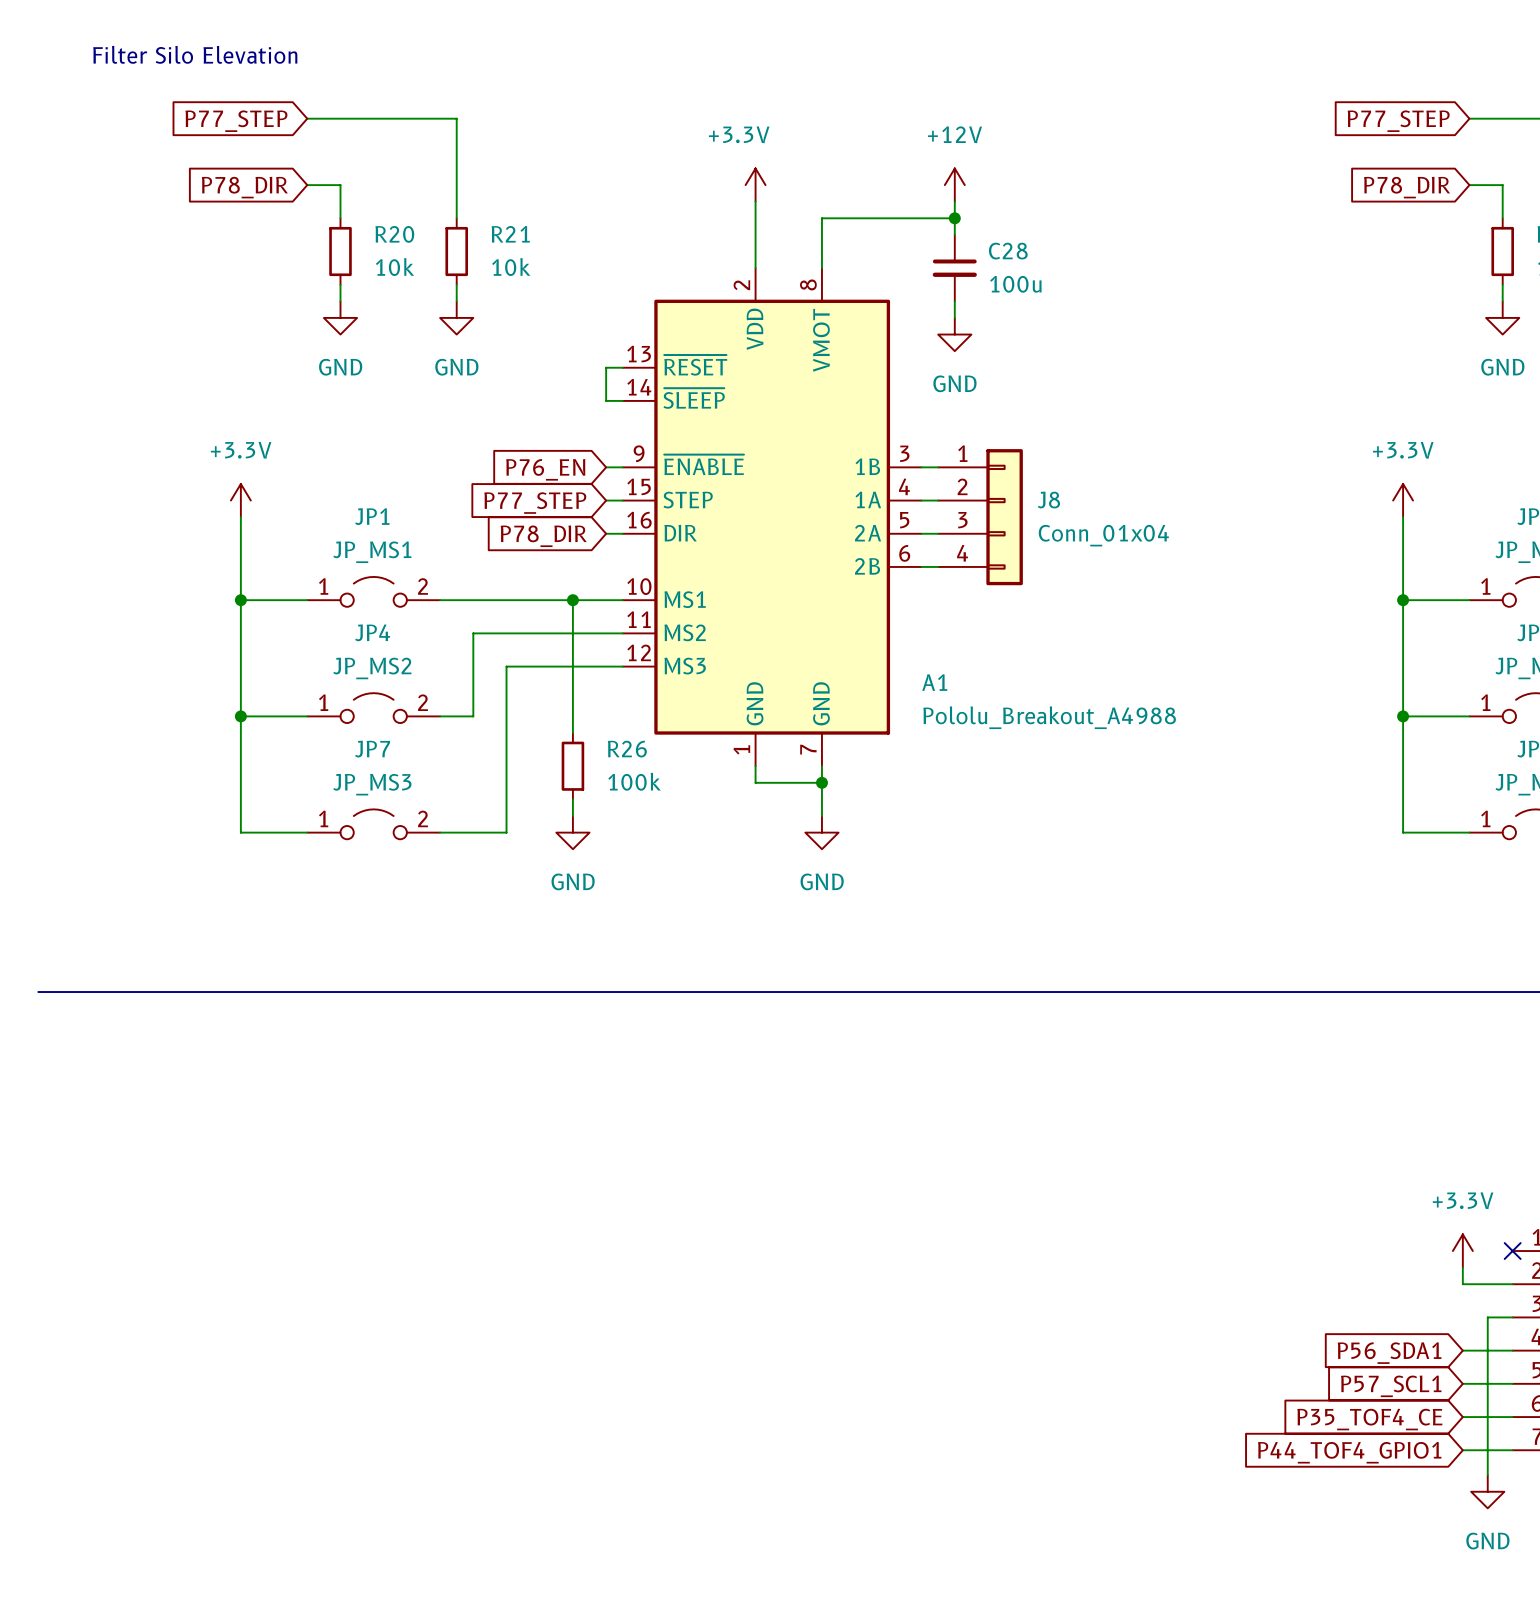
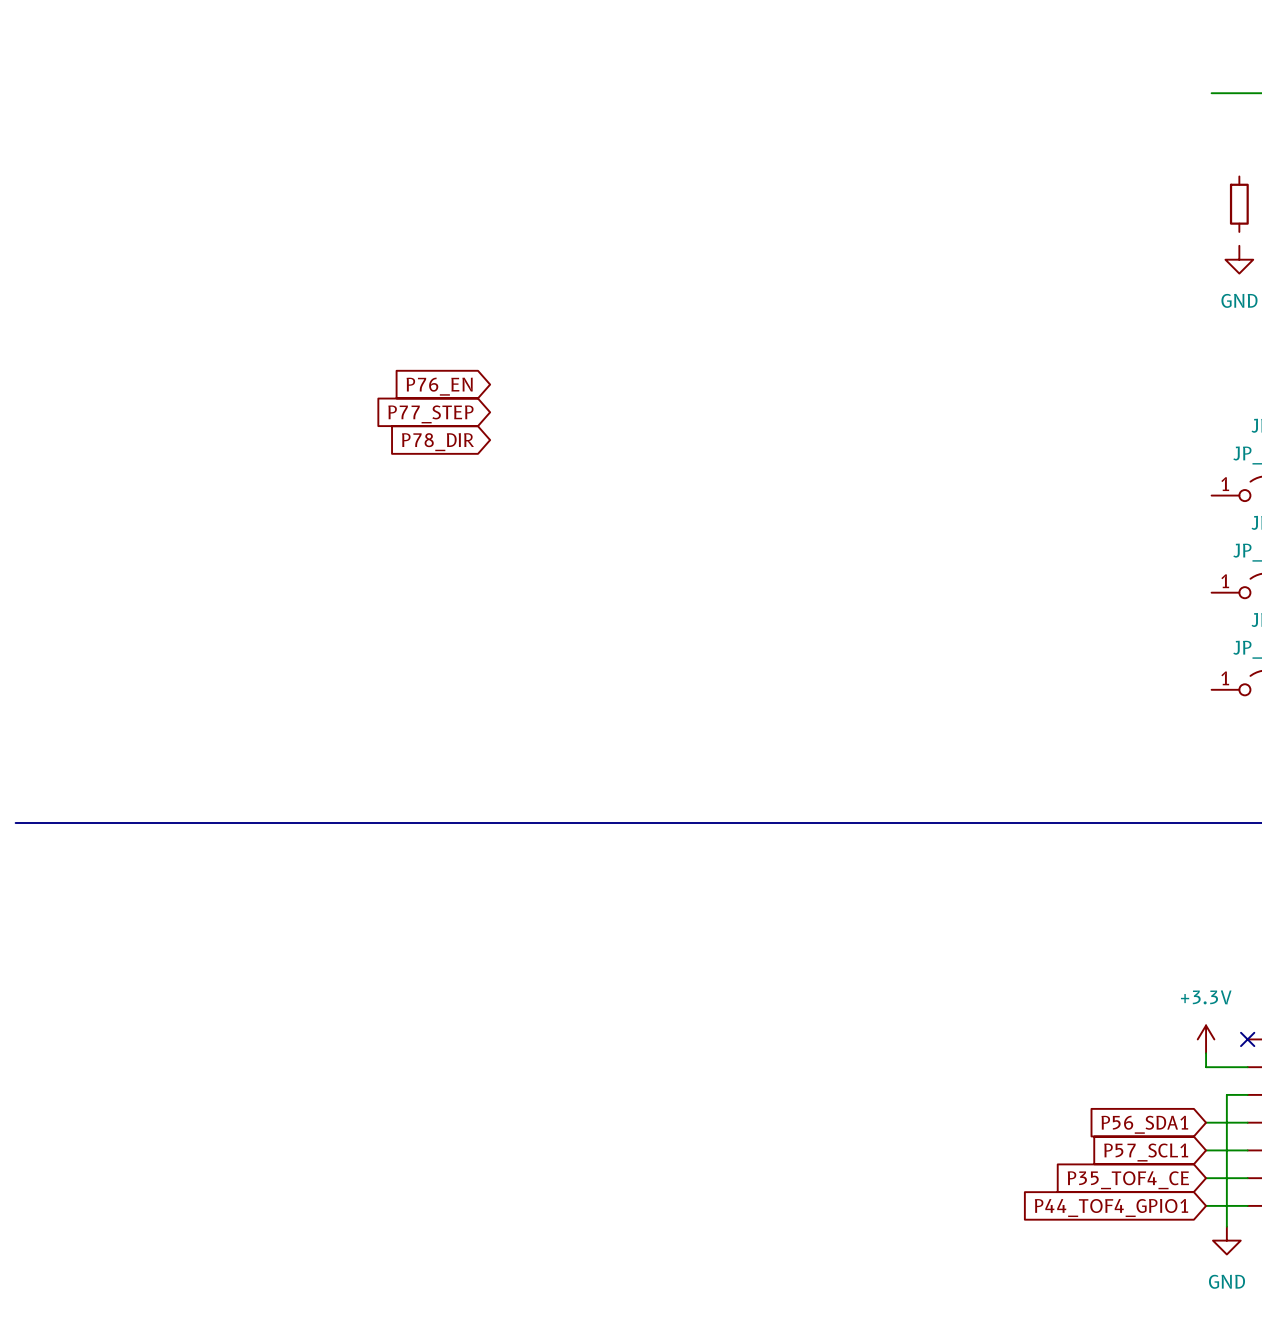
text: Filter Silo Elevation (195, 54) -> none
wire: (307, 118) (456, 118) (456, 218) -> none
global label: P77_STEP (236, 121) -> none
global label: P77_STEP (1398, 121) -> none
wire: (307, 185) (340, 185) (340, 218) -> none
power symbol: +3.3V (755, 185) -> none
power symbol: +12V (954, 185) -> none
wire: (1469, 185) (1502, 185) (1502, 218) -> none
global label: P78_DIR (244, 187) -> none
global label: P78_DIR (1407, 187) -> none
wire: (755, 201) (755, 268) -> none
wire: (954, 201) (954, 234) -> none
wire: (954, 218) (821, 218) (821, 268) -> none
junction: (954, 218) -> none
R20: 10k (340, 251) -> none
R21: 10k (456, 251) -> none
C28: 100u (954, 268) -> none
wire: (340, 284) (340, 301) -> none
wire: (456, 284) (456, 301) -> none
wire: (1502, 284) (1502, 301) -> none
wire: (954, 301) (954, 317) -> none
power symbol: GND (340, 317) -> none
power symbol: GND (456, 317) -> none
power symbol: GND (954, 334) -> none
wire: (622, 367) (606, 367) (606, 400) (622, 400) -> none
wire: (606, 467) (622, 467) -> none
wire: (921, 467) (938, 467) -> none
power symbol: +3.3V (240, 500) -> none
wire: (606, 500) (622, 500) -> none
wire: (921, 500) (938, 500) -> none
power symbol: +3.3V (1403, 500) -> none
wire: (240, 517) (240, 832) (307, 832) -> none
A1: Pololu_Breakout_A4988 (772, 517) -> none
J8: Conn_01x04 (980, 517) -> none
wire: (1403, 517) (1403, 832) (1469, 832) -> none
wire: (606, 533) (622, 533) -> none
wire: (921, 533) (938, 533) -> none
wire: (921, 566) (938, 566) -> none
JP1: JP_MS1 (373, 591) -> none
wire: (240, 600) (307, 600) -> none
junction: (240, 600) -> none
wire: (440, 600) (622, 600) -> none
wire: (572, 600) (572, 733) -> none
junction: (572, 600) -> none
wire: (1403, 600) (1469, 600) -> none
junction: (1403, 600) -> none
wire: (622, 633) (473, 633) (473, 716) (440, 716) -> none
wire: (622, 666) (506, 666) (506, 832) (440, 832) -> none
JP4: JP_MS2 (373, 708) -> none
wire: (240, 716) (307, 716) -> none
junction: (240, 716) -> none
wire: (1403, 716) (1469, 716) -> none
junction: (1403, 716) -> none
R26: 100k (572, 766) -> none
wire: (755, 766) (755, 782) (821, 782) -> none
wire: (821, 766) (821, 816) -> none
junction: (821, 782) -> none
wire: (572, 799) (572, 816) -> none
JP7: JP_MS3 (373, 824) -> none
power symbol: GND (572, 832) -> none
power symbol: GND (821, 832) -> none

